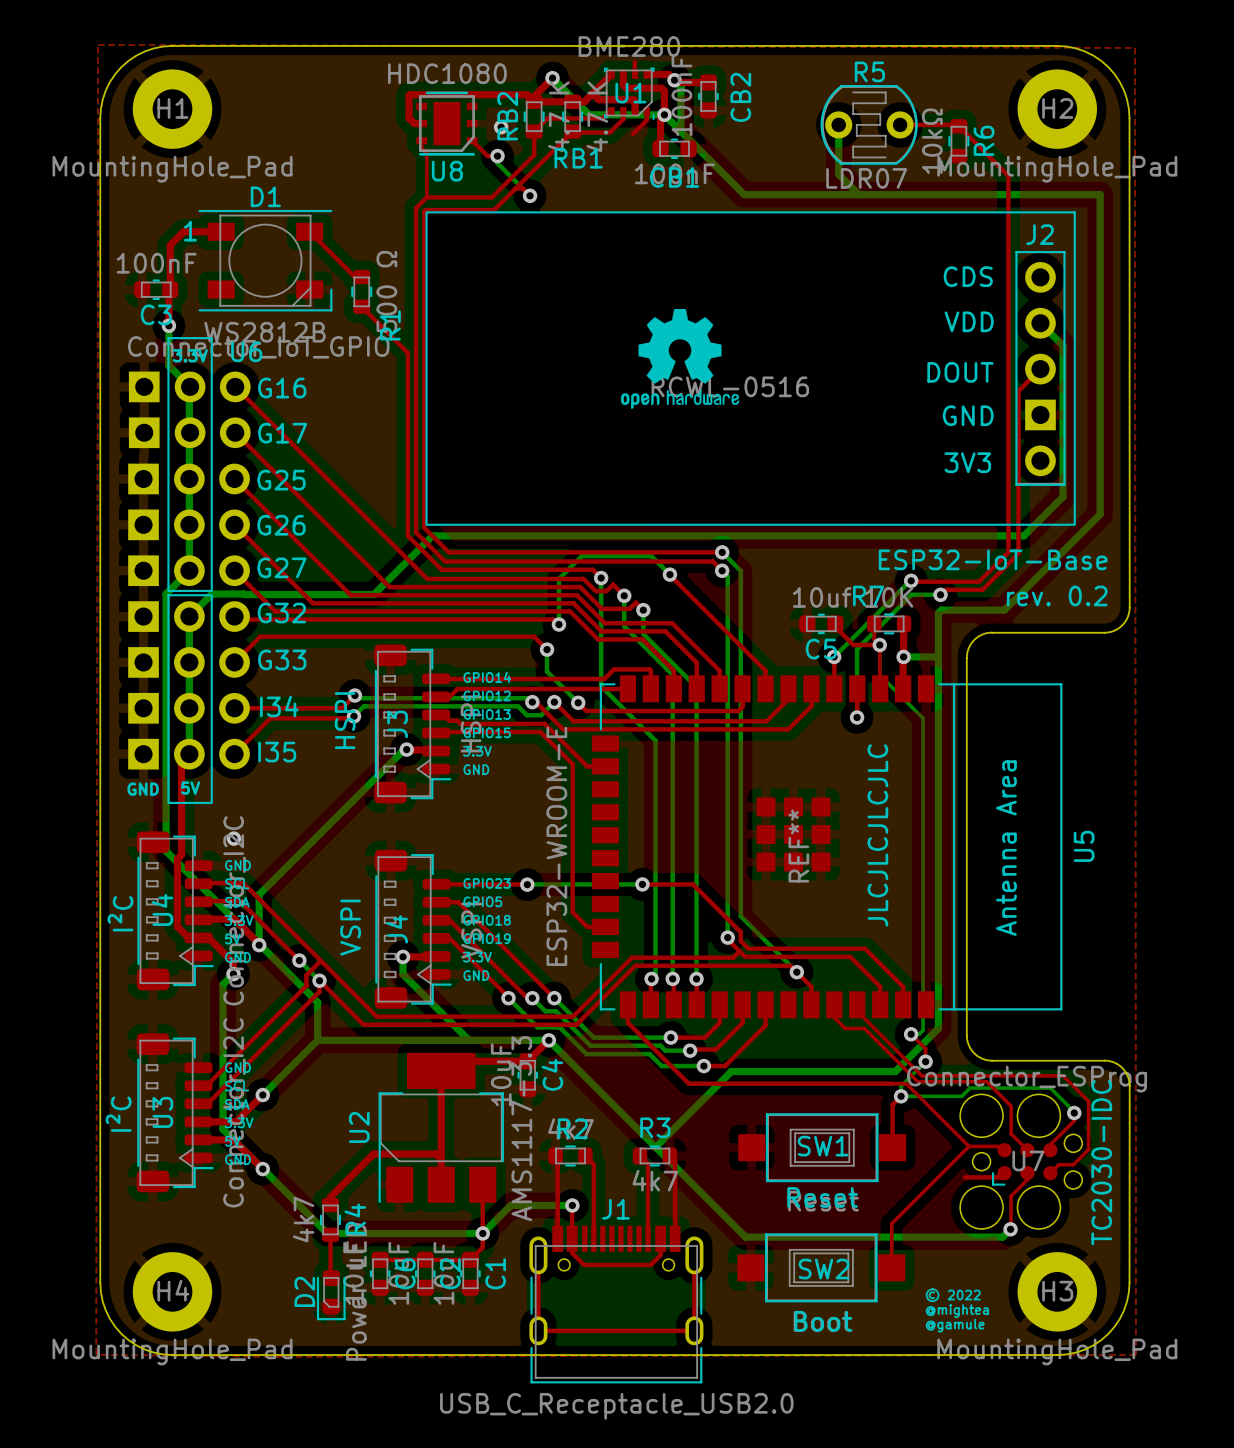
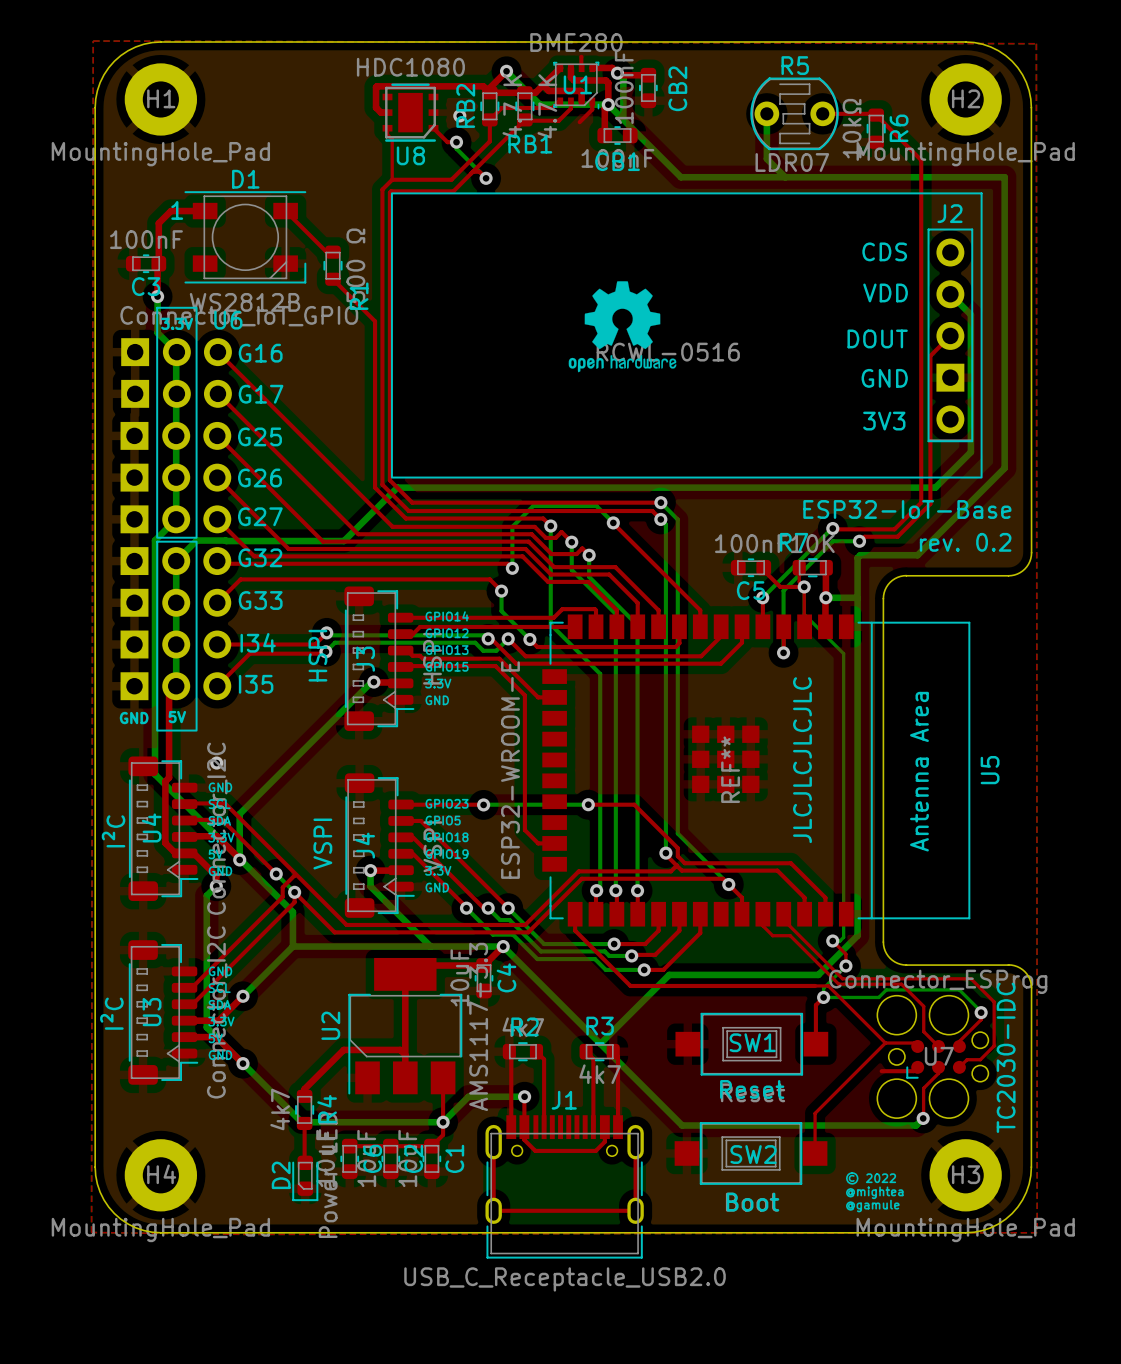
C5 value: 10uf (822, 597) -> 100nF (751, 543)

